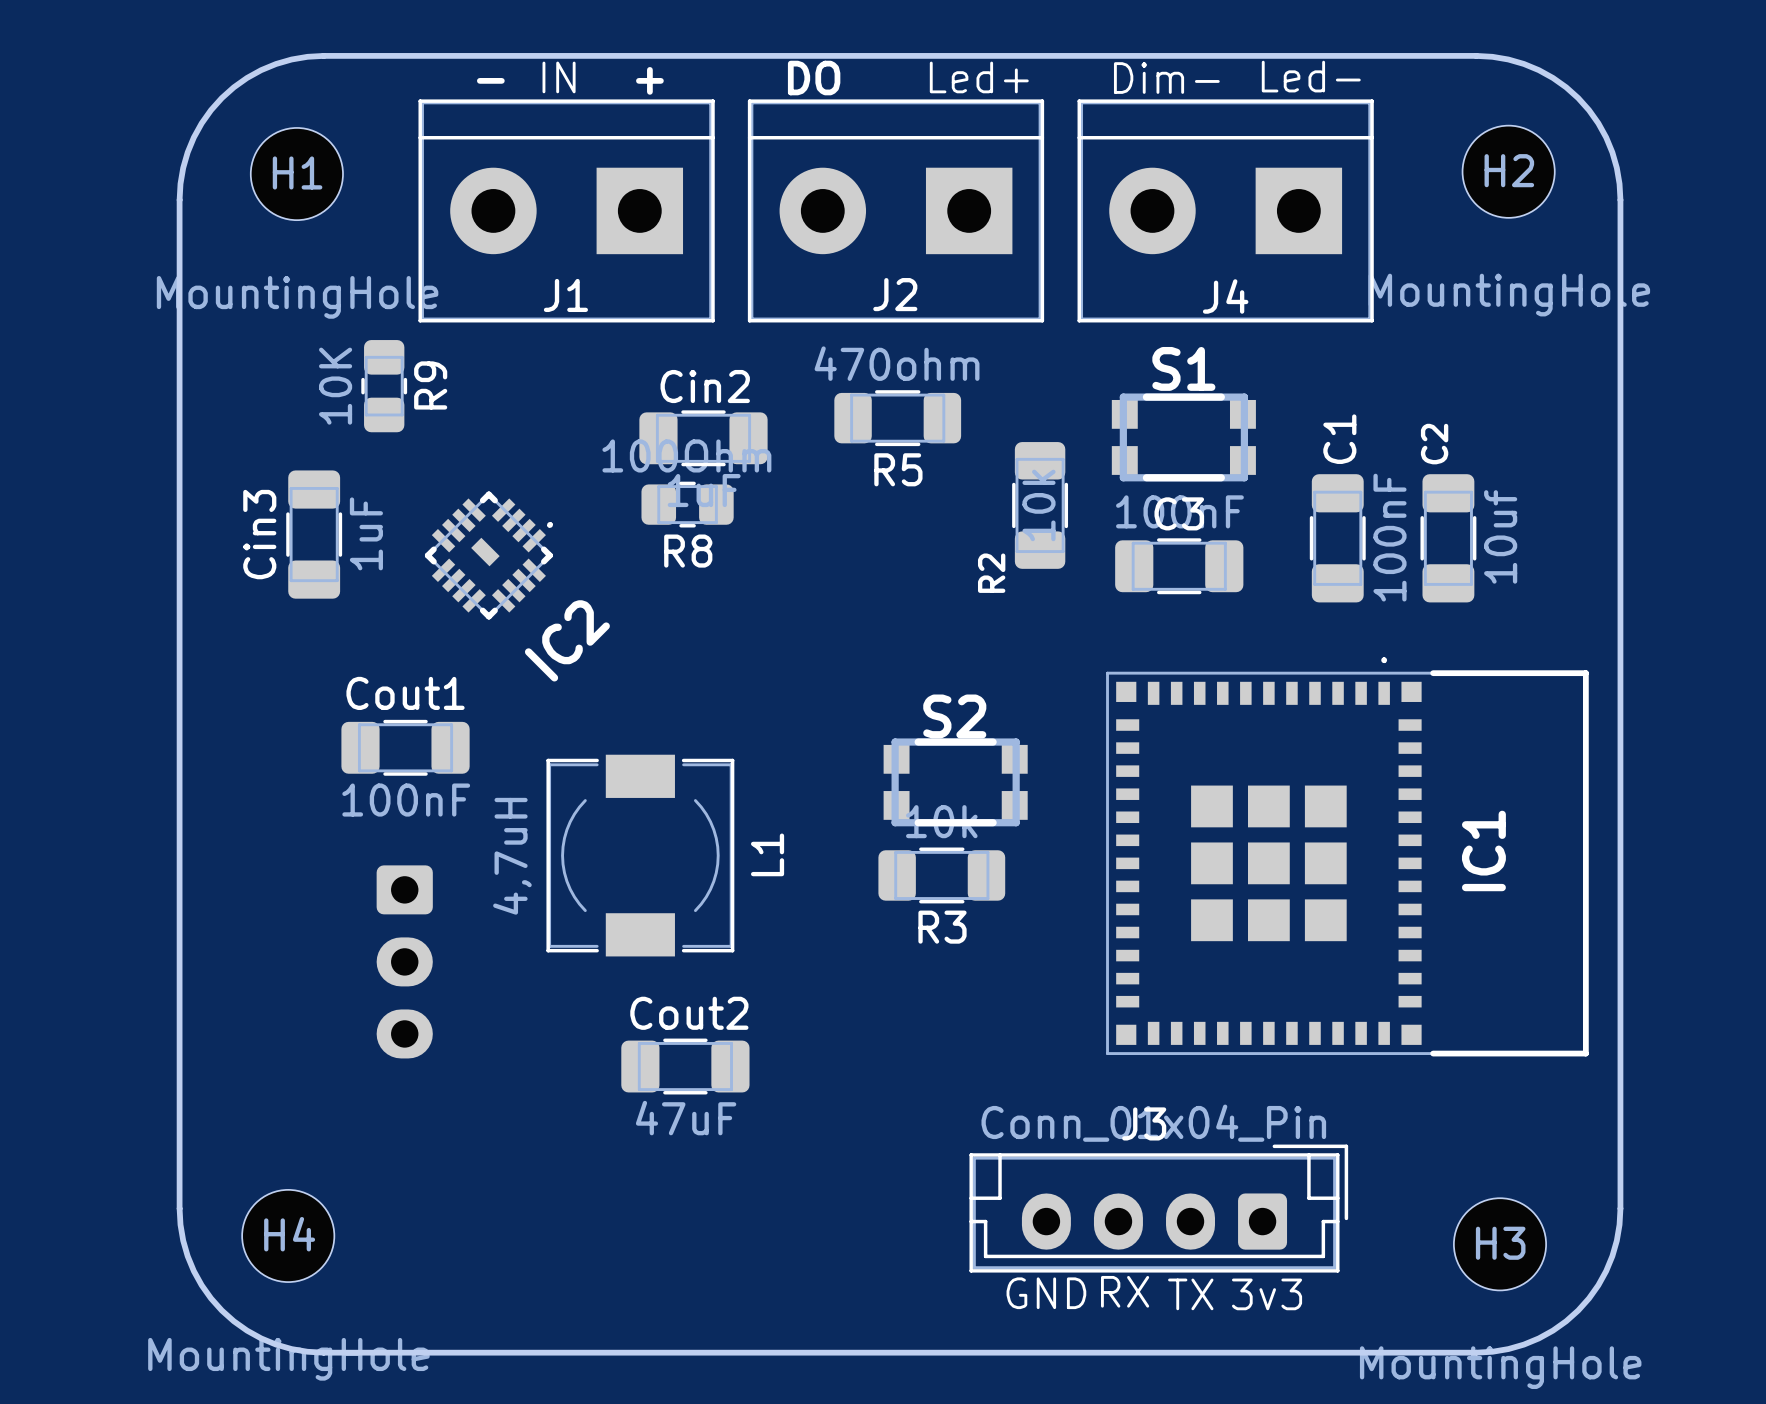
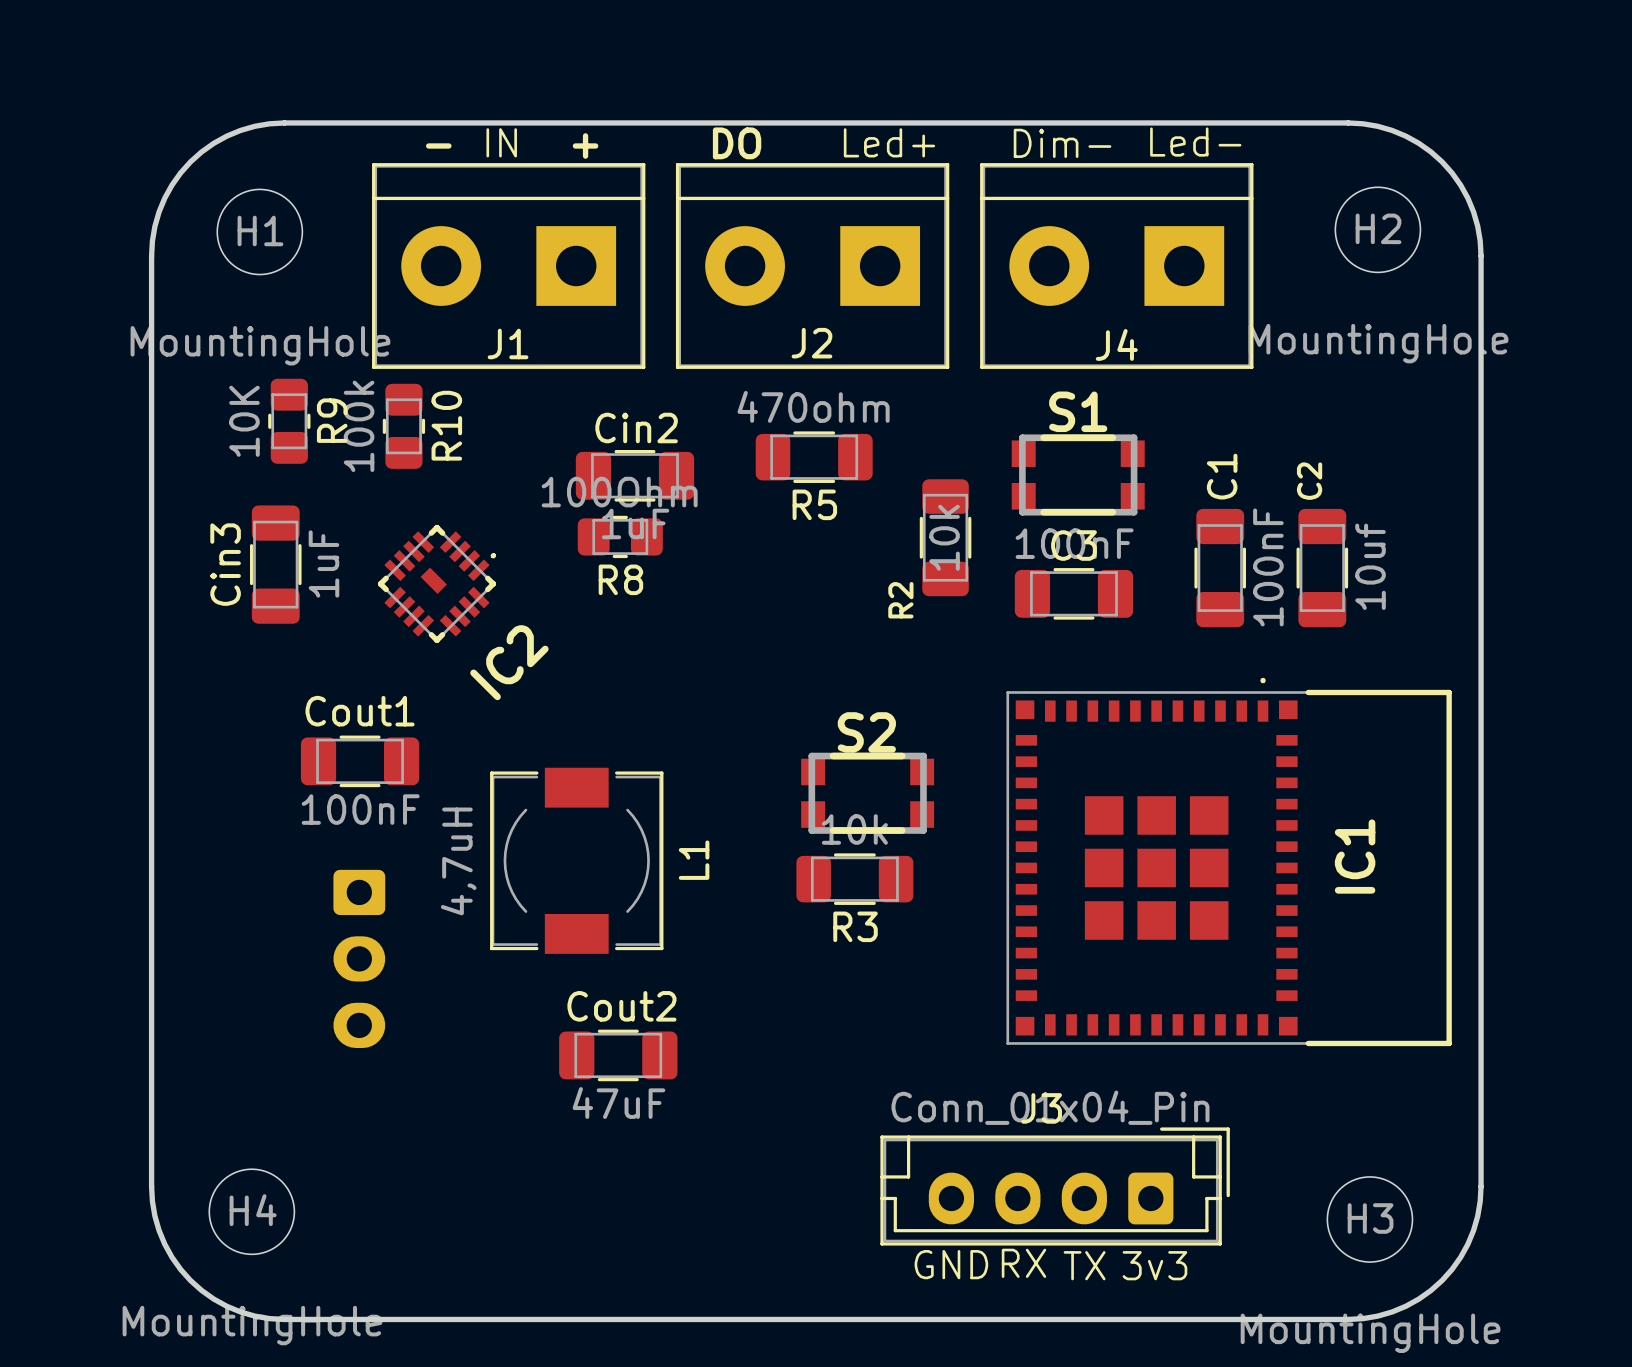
R10: none -> 100k (403, 426)
R9 position: (384, 386) -> (289, 421)

